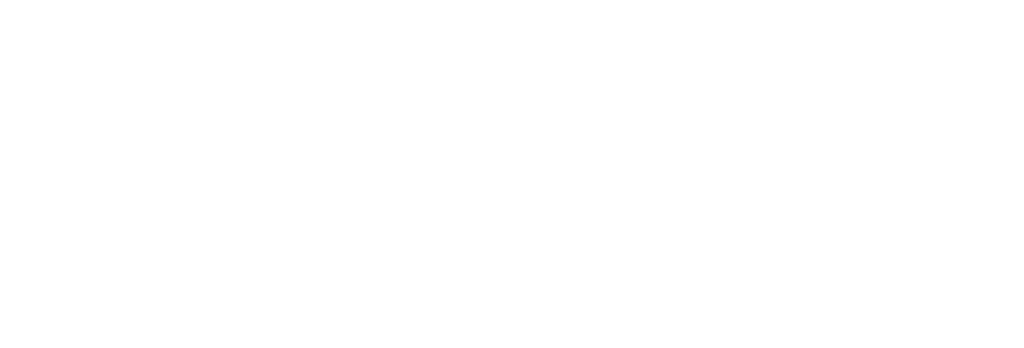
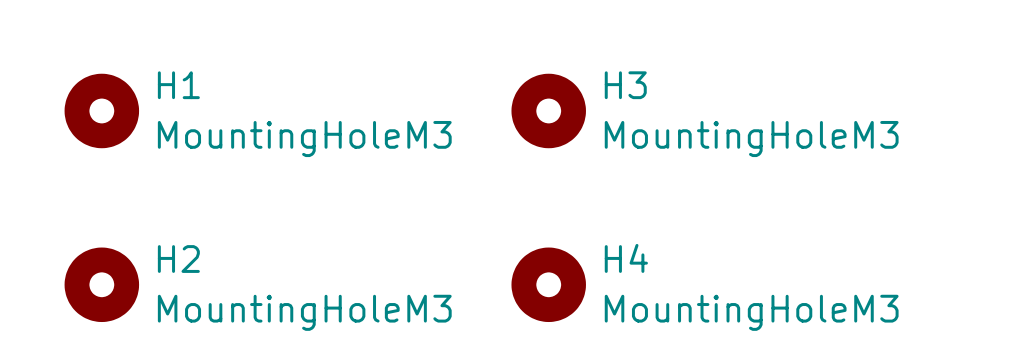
H1: none -> MountingHoleM3 (101, 110)
H3: none -> MountingHoleM3 (548, 110)
H2: none -> MountingHoleM3 (101, 284)
H4: none -> MountingHoleM3 (548, 284)

